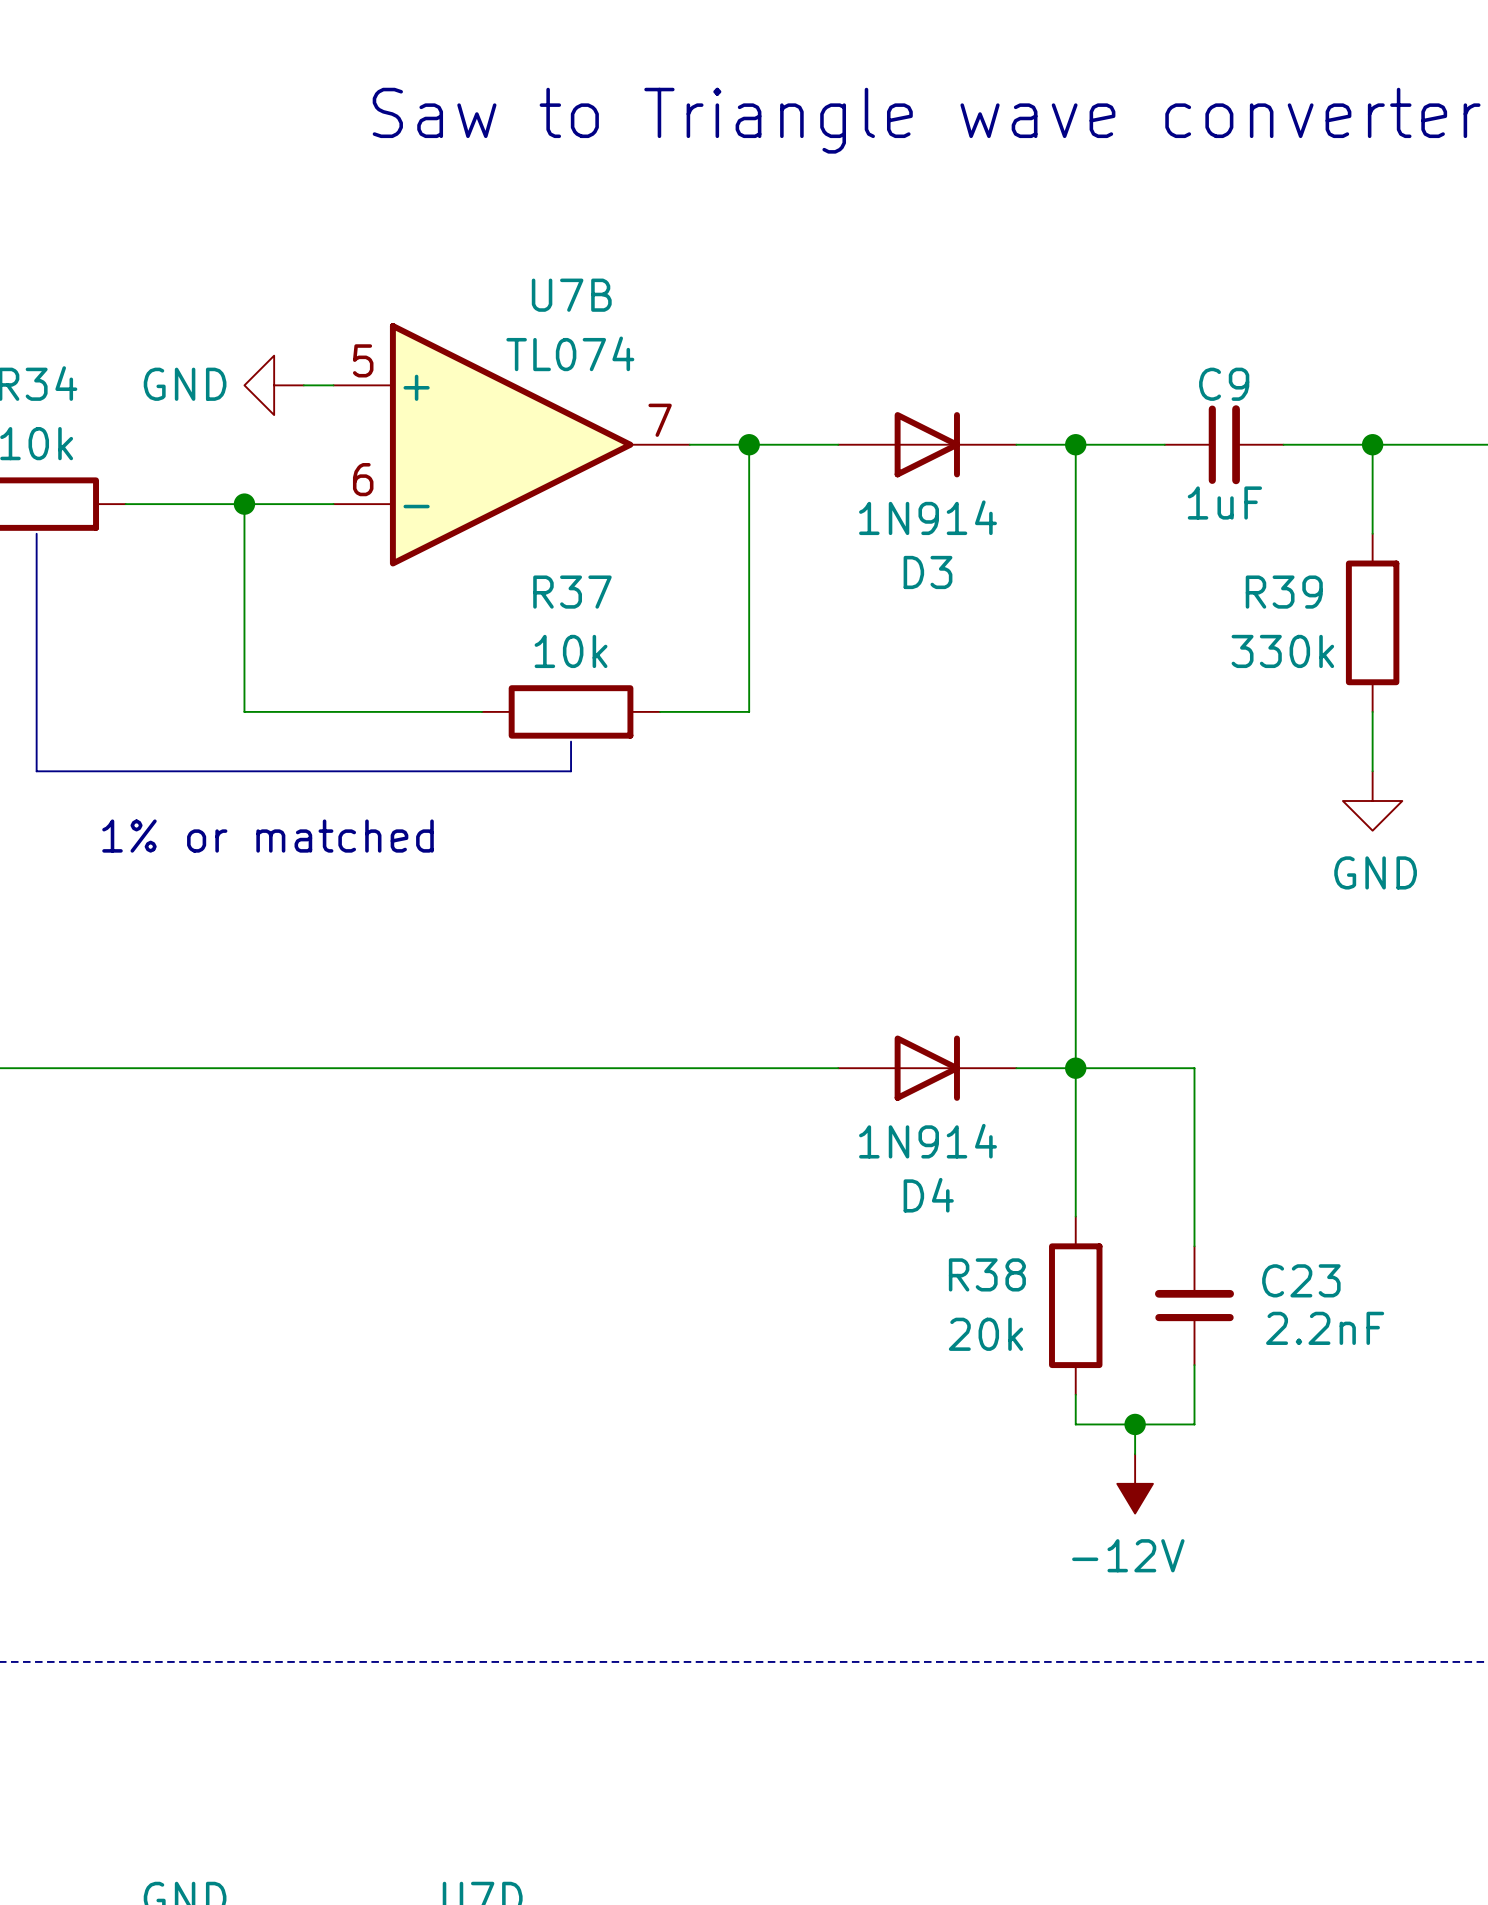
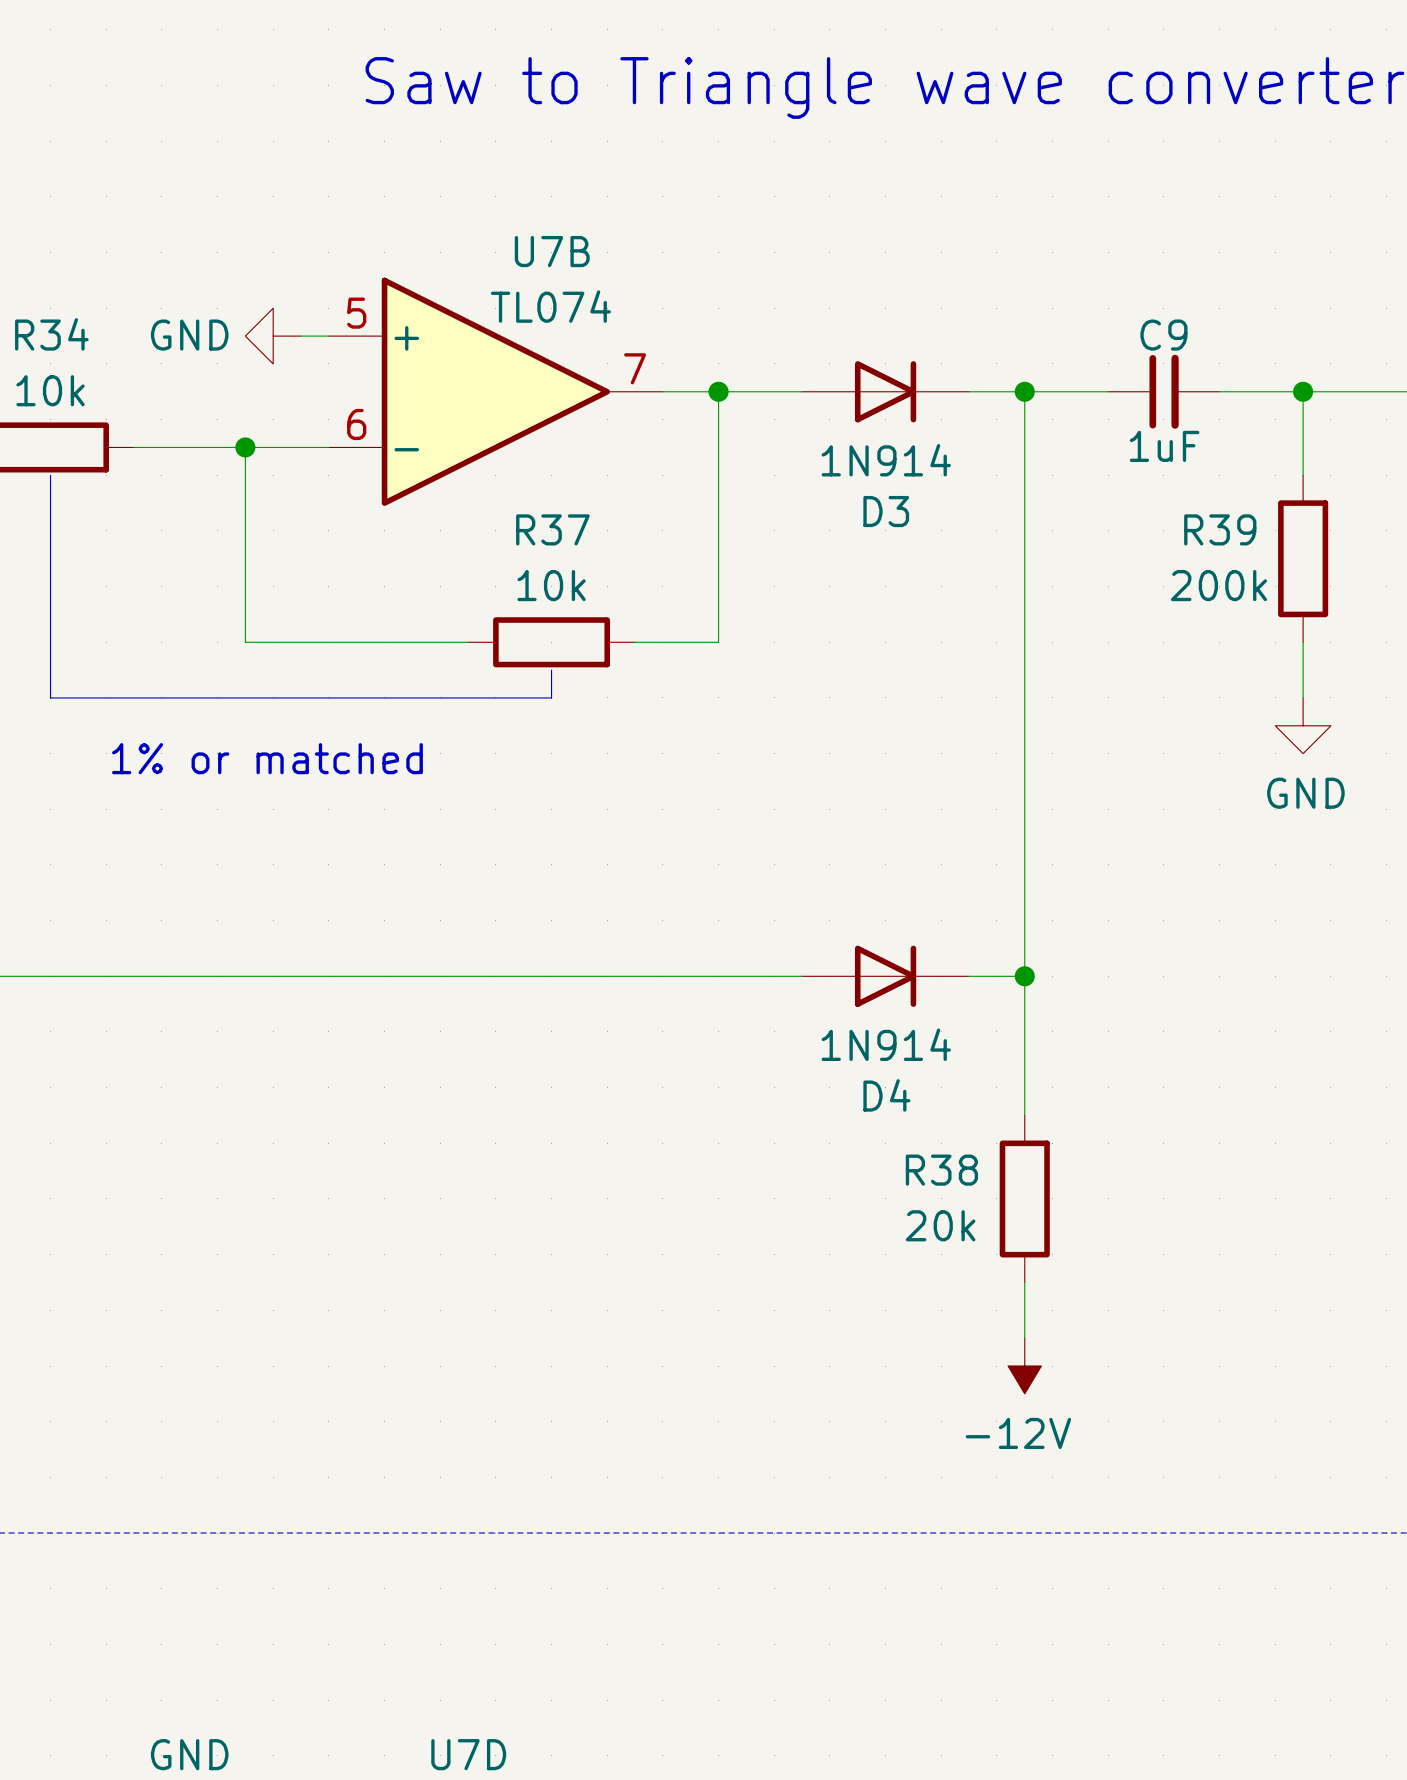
R39 value: 330k (1282, 651) -> 200k (1218, 585)
wire: (1075, 1068) (1194, 1068) (1194, 1246) -> none
C23: 2.2nF (1194, 1305) -> none
wire: (1194, 1365) (1194, 1424) (1075, 1424) -> (1024, 1338) (1024, 1310)
wire: (1135, 1424) (1135, 1454) -> none
junction: (1135, 1424) -> none
power symbol position: -12V (1135, 1483) -> -12V (1024, 1366)

